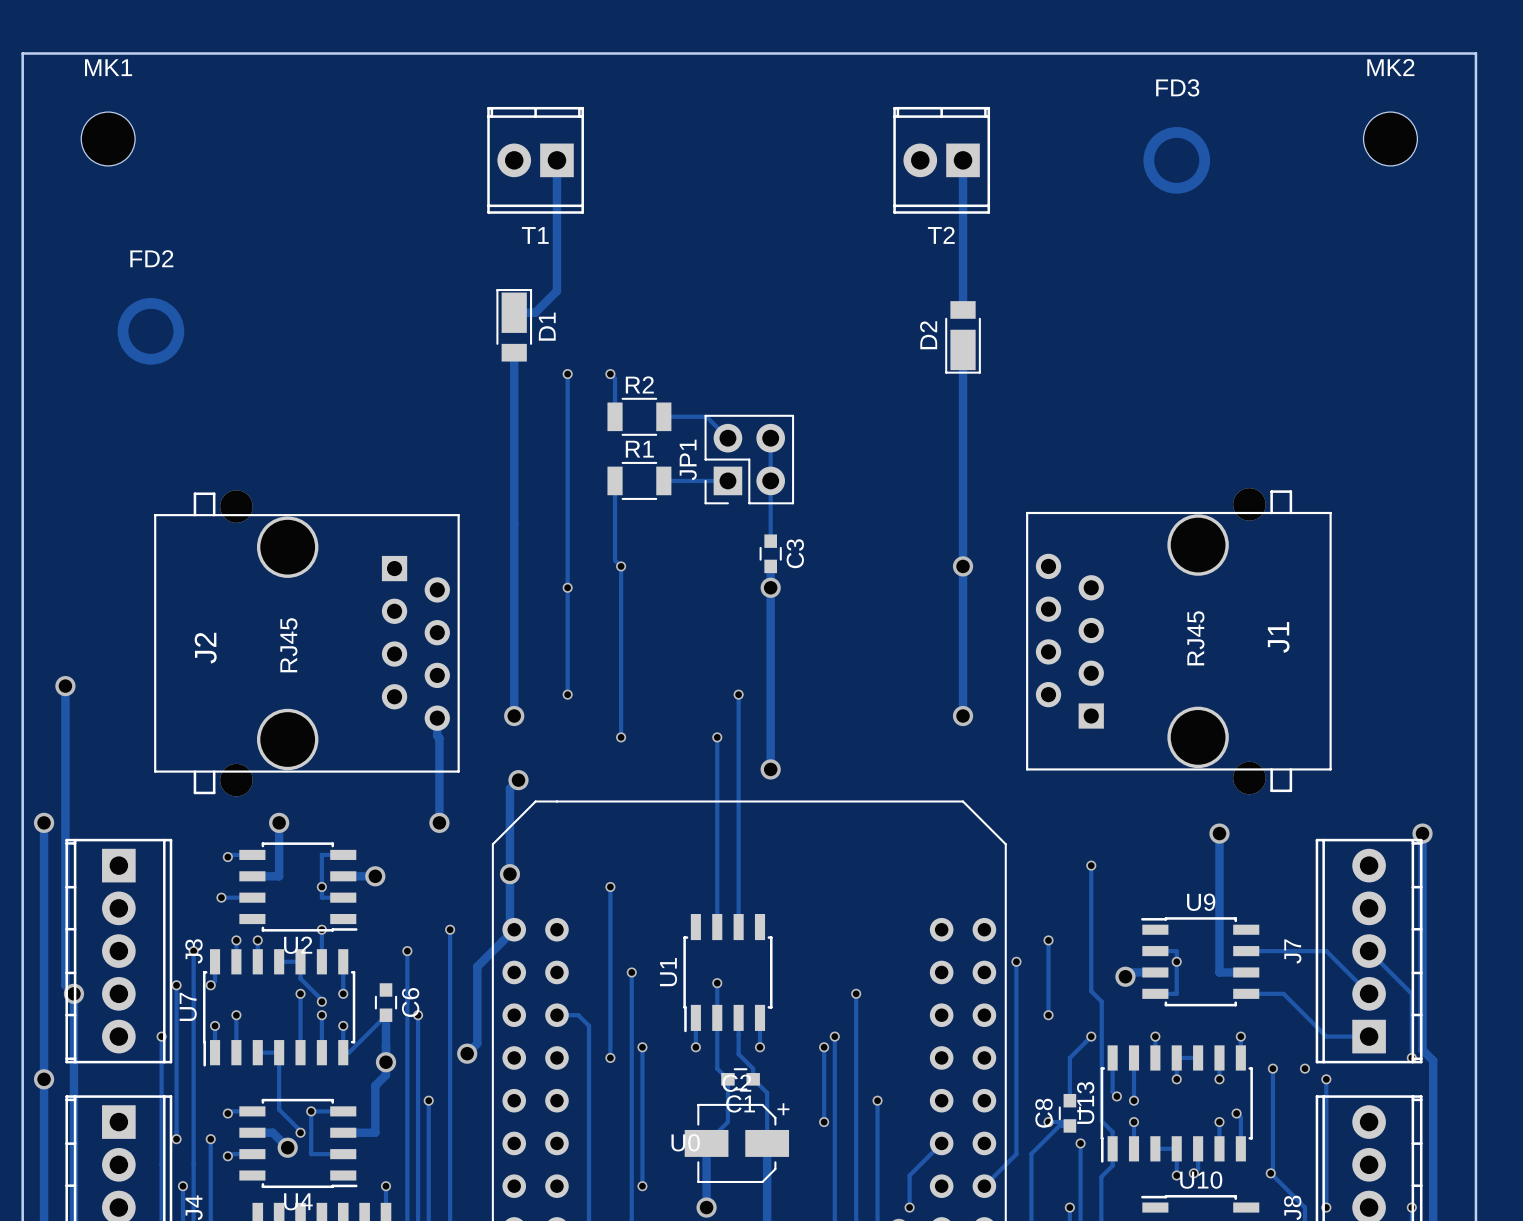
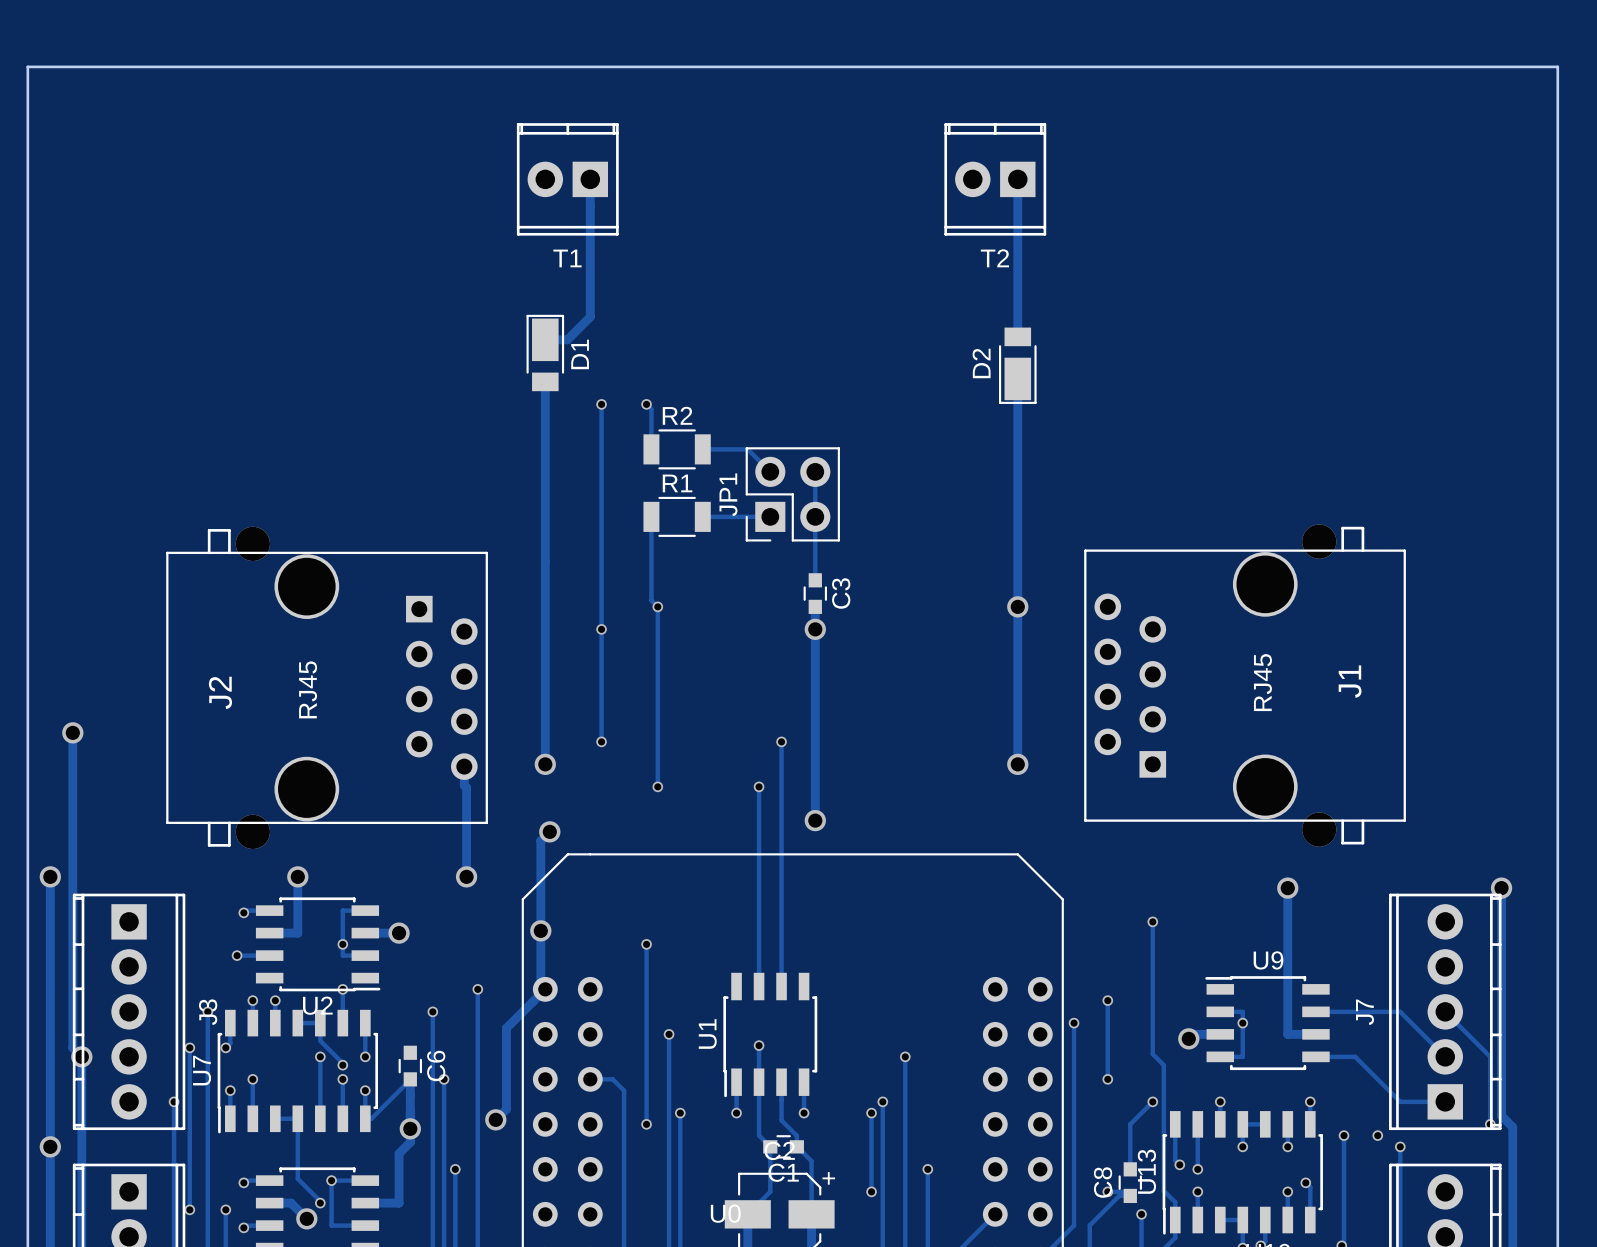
MK1: (108, 138) -> none
MK2: (1390, 138) -> none
FD3: (1176, 160) -> none
FD2: (150, 331) -> none

